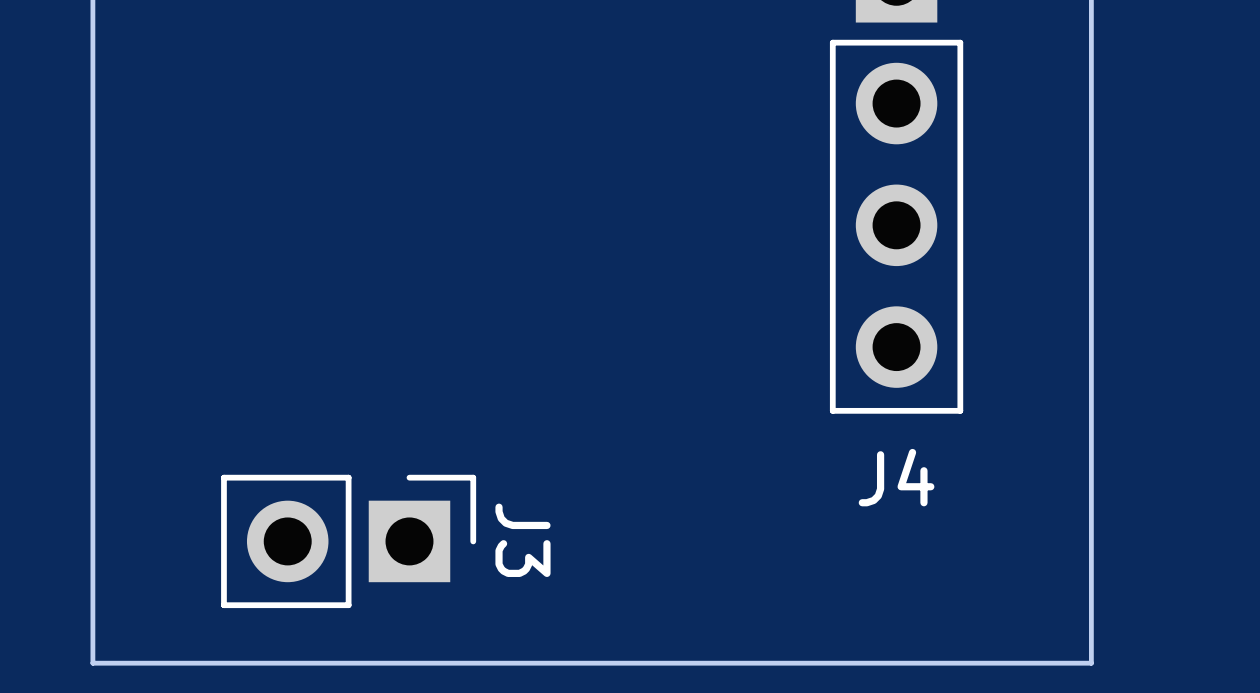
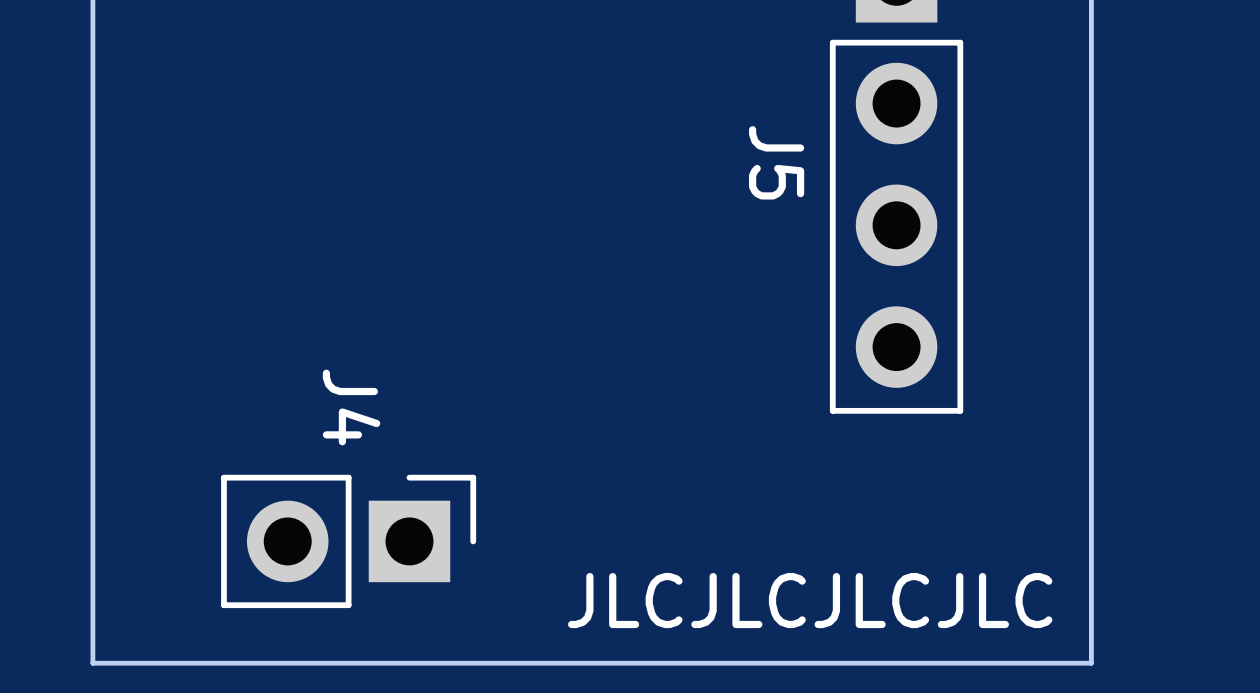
J4 name: J4 (896, 477) -> J5 (776, 162)
J3 name: J3 (522, 540) -> J4 (351, 407)
text: none -> JLCJLCJLCJLC (810, 600)

